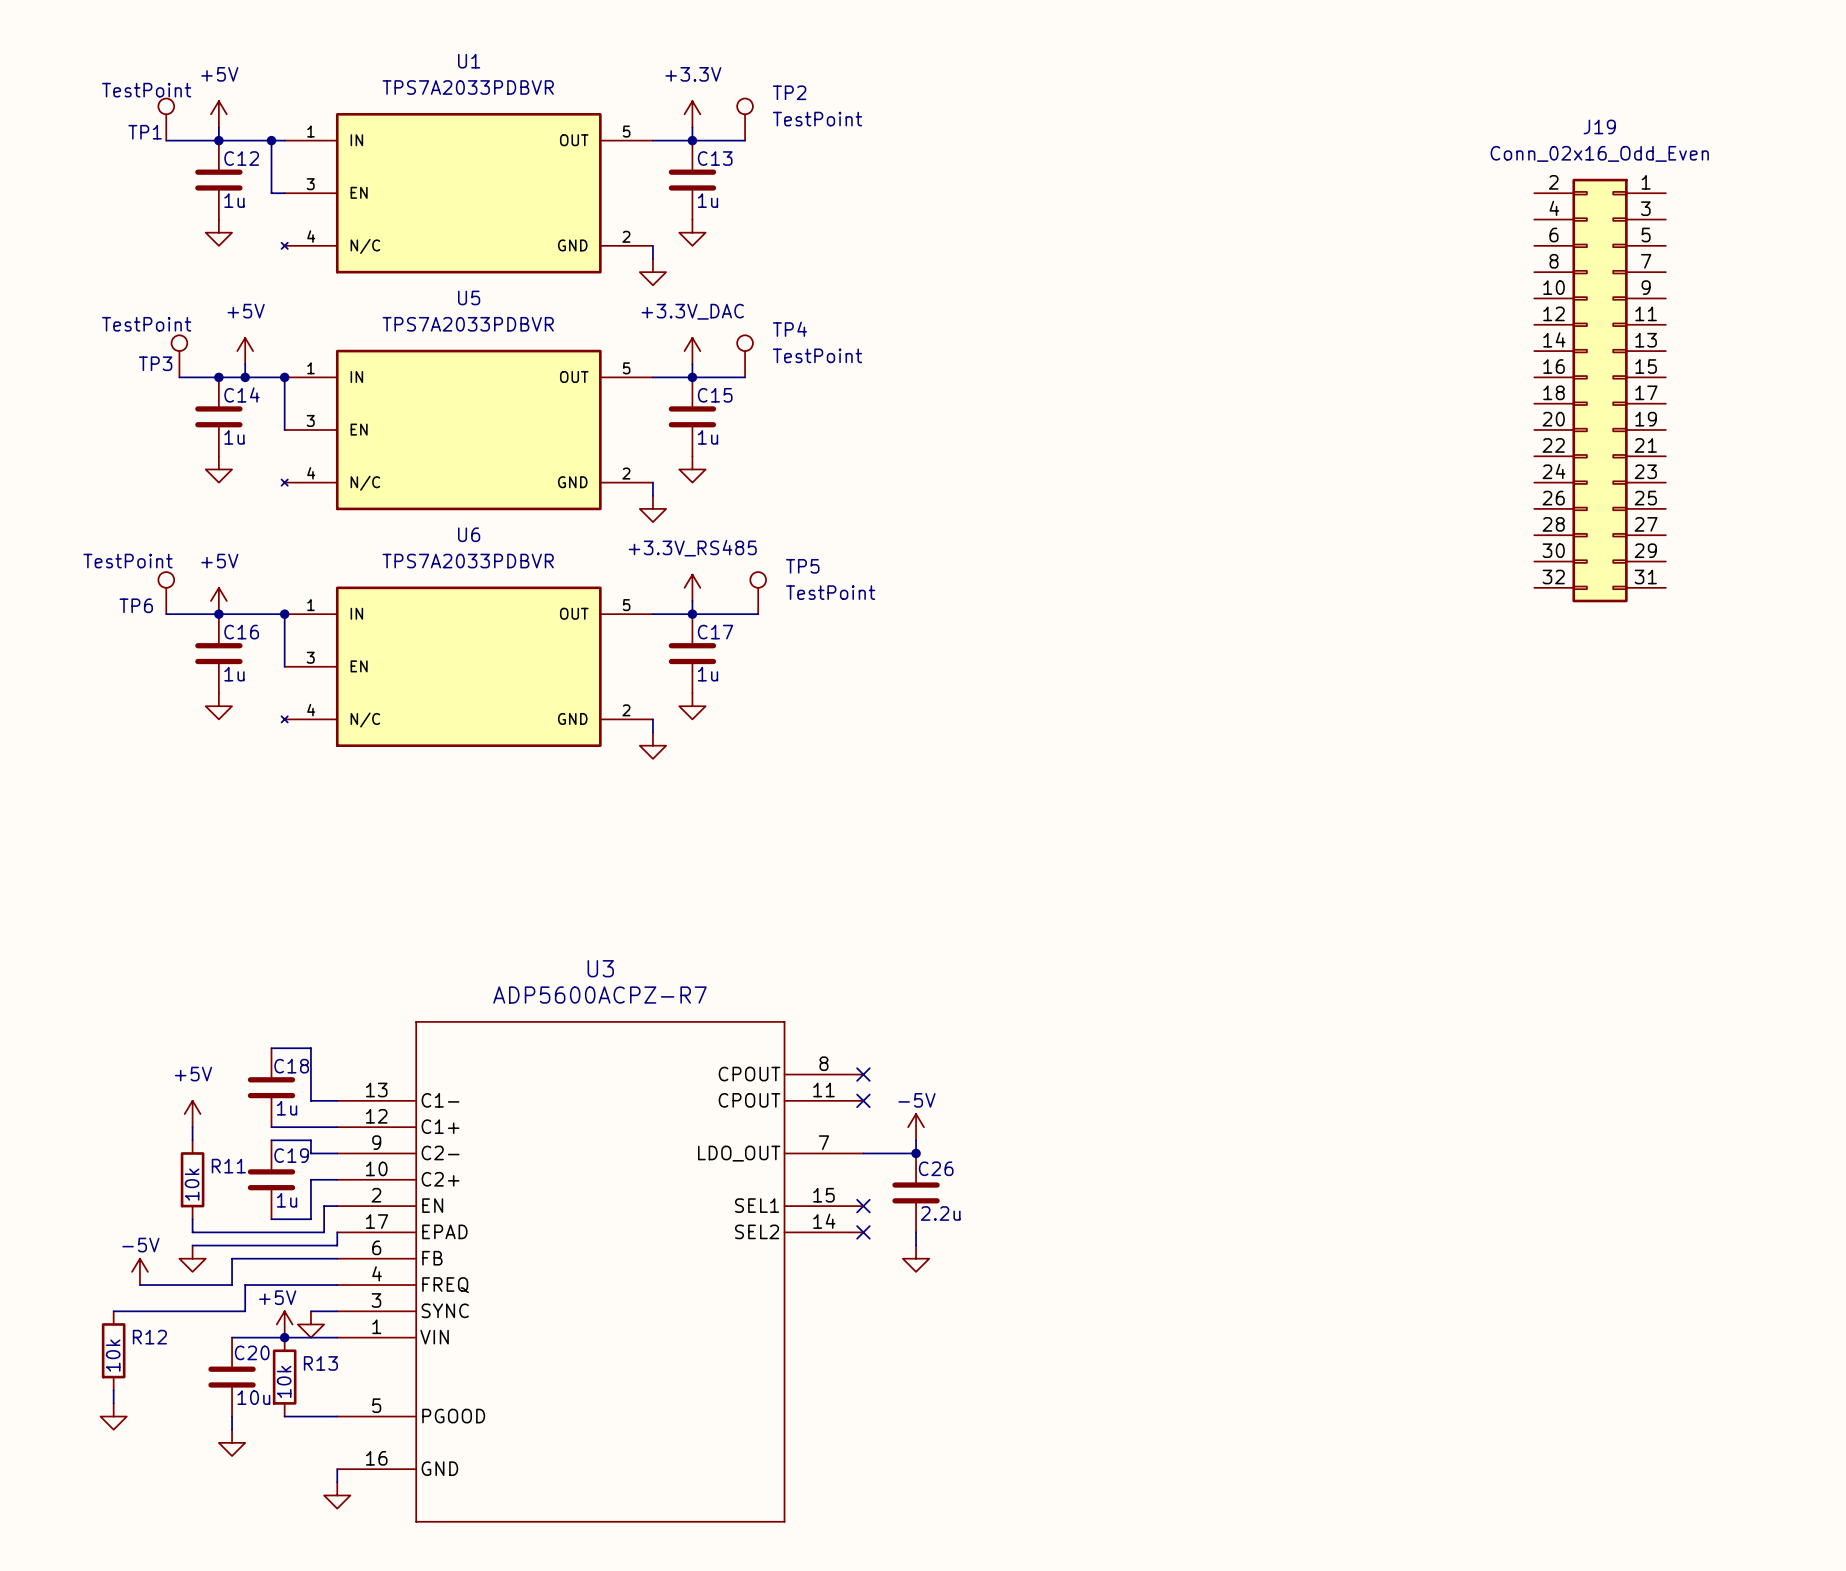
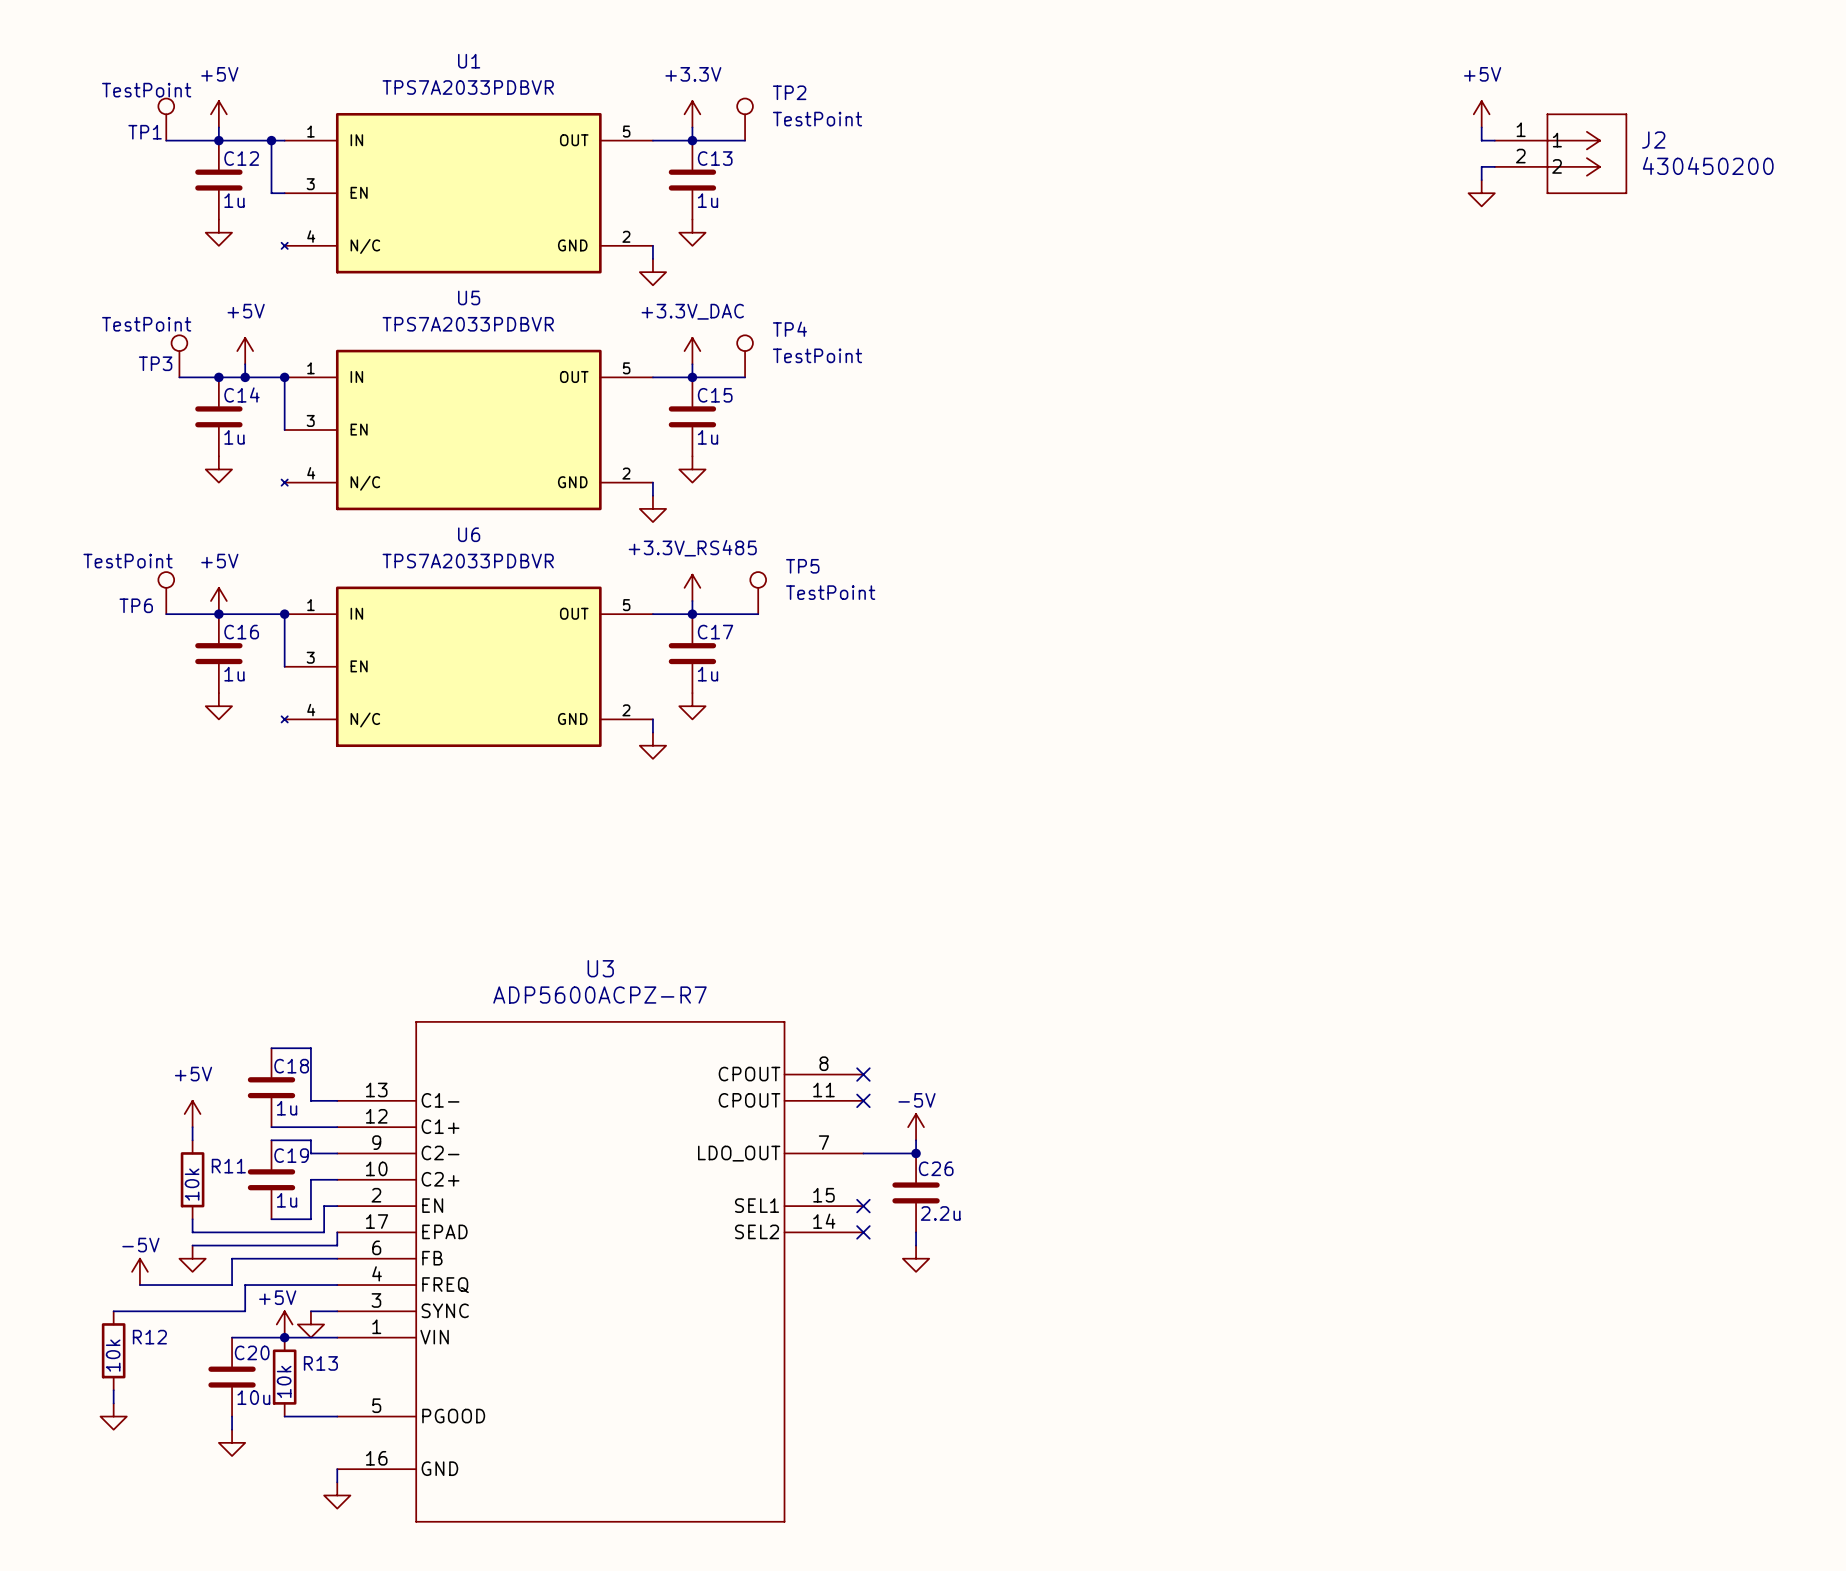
power symbol: none -> +5V (1481, 114)
wire: none -> (1481, 127) (1481, 140) (1494, 140)
J2: none -> 430450200 (1560, 153)
wire: none -> (1494, 166) (1481, 166) (1481, 180)
power symbol: none -> (1481, 193)
J19: Conn_02x16_Odd_Even (1600, 390) -> none

